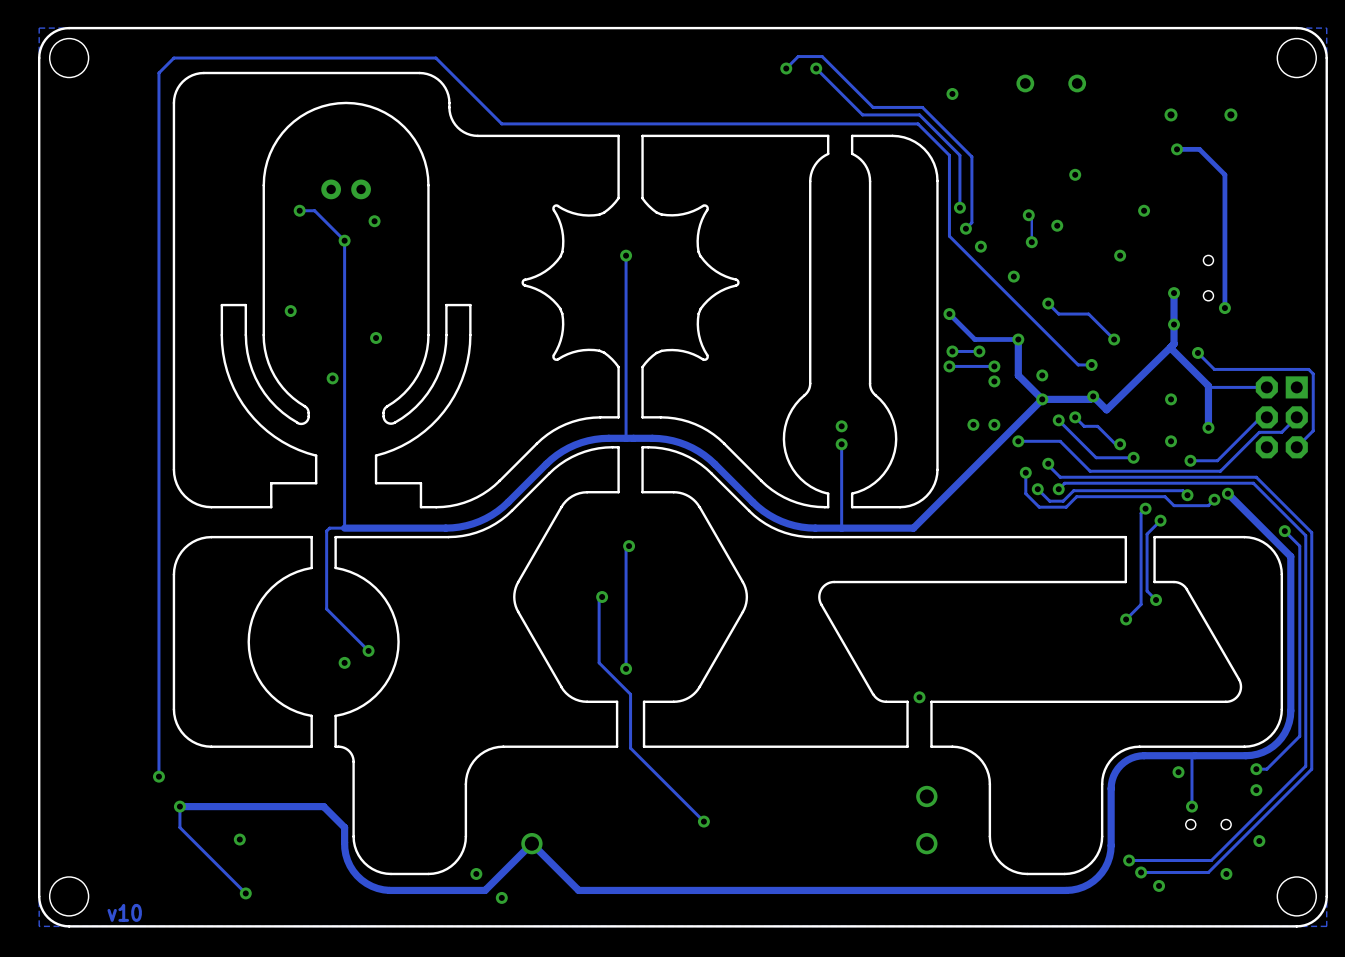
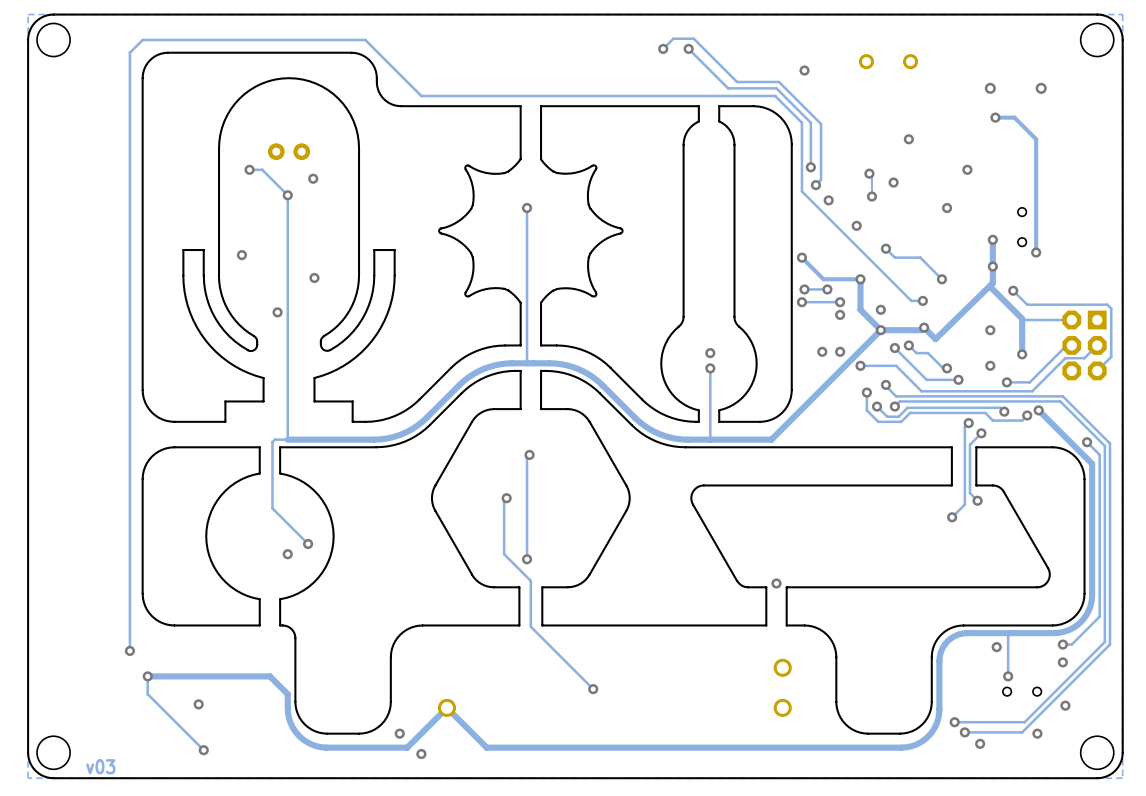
text: v10 (124, 912) -> v03 (100, 766)

